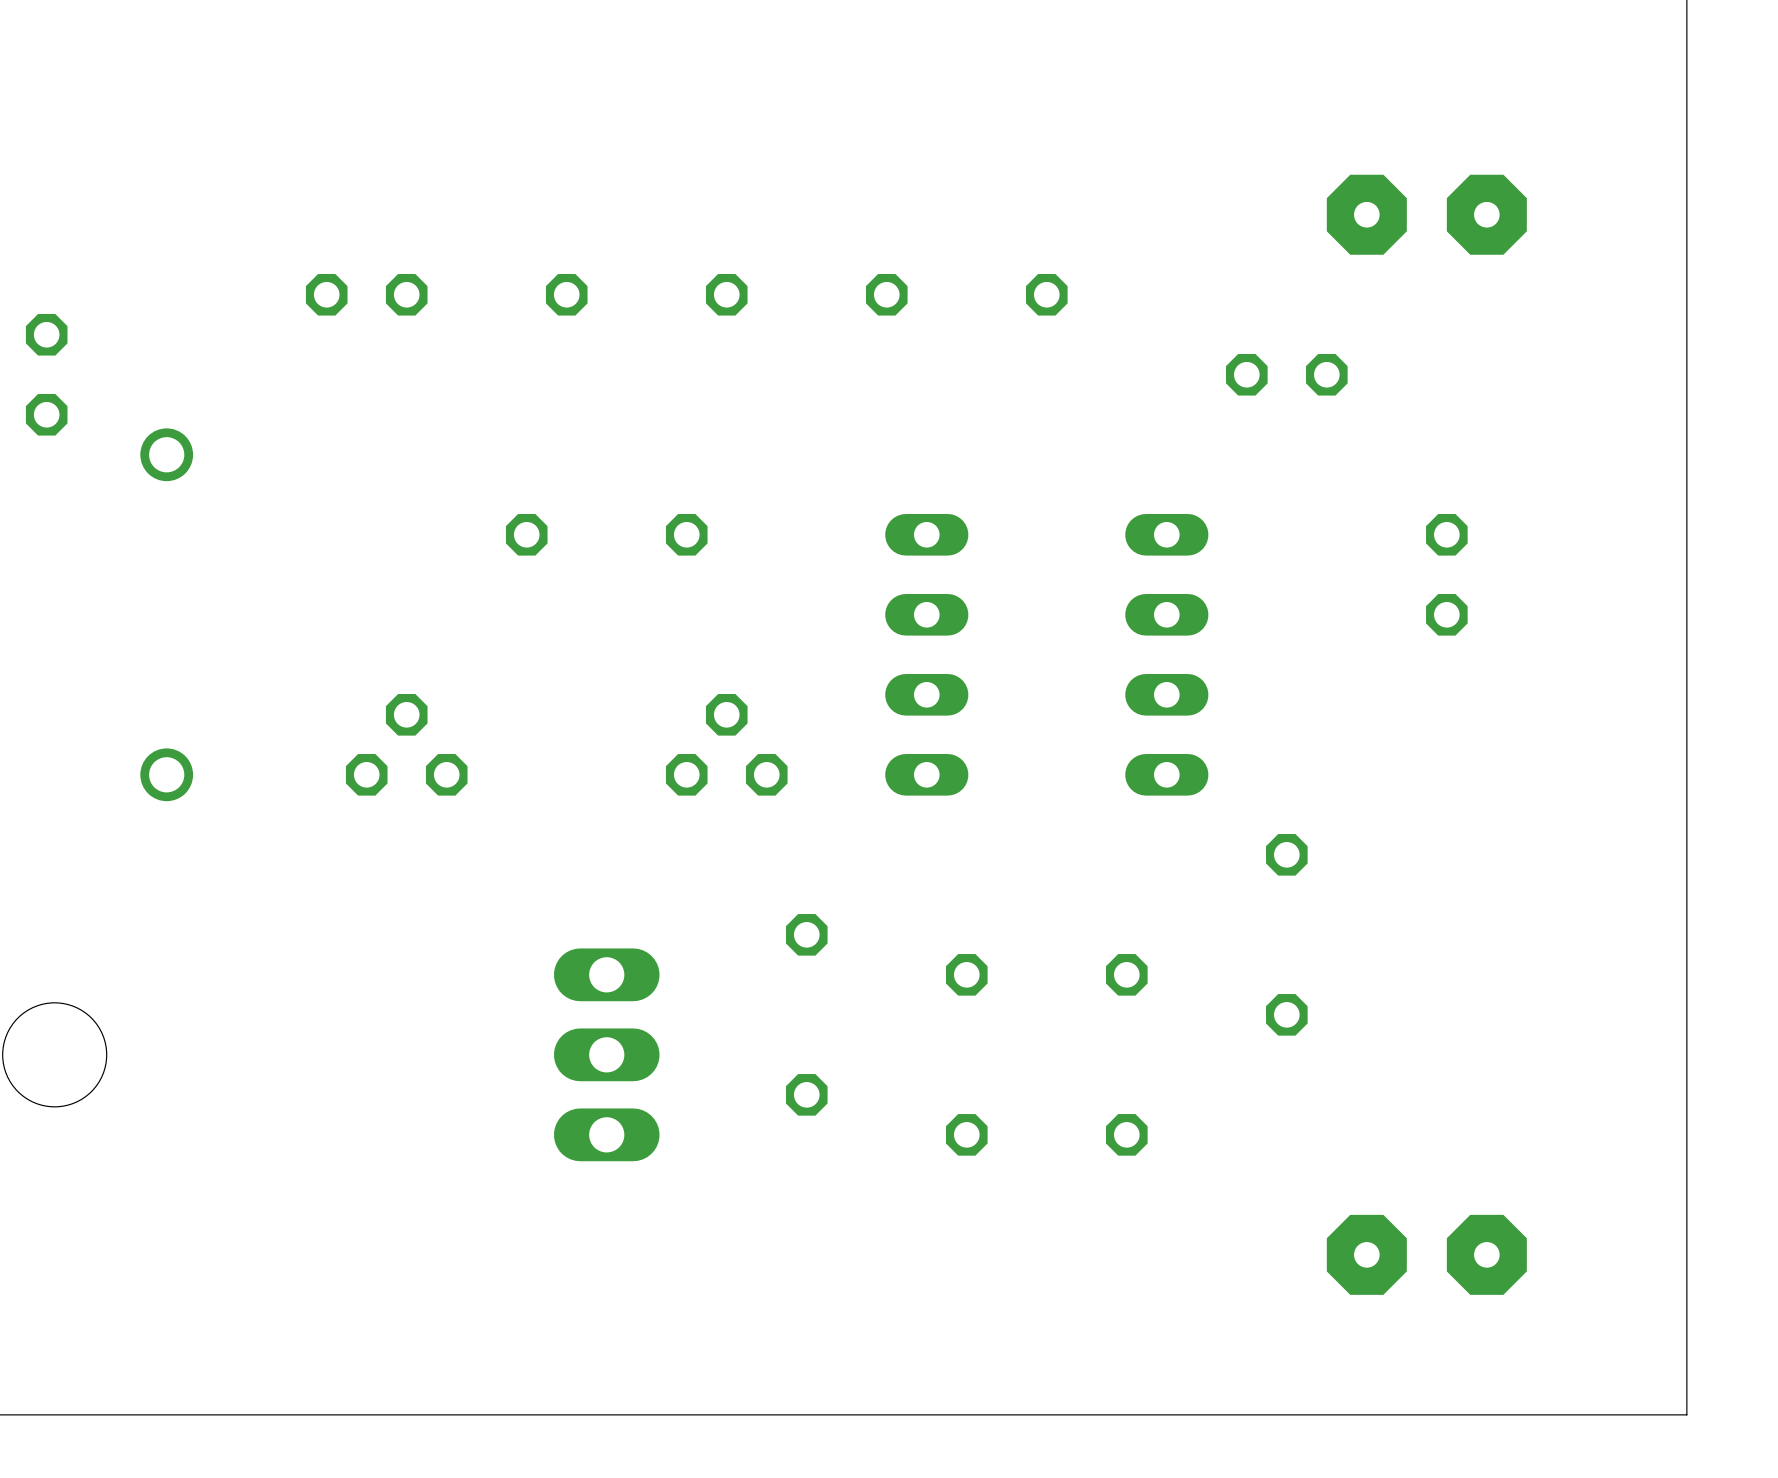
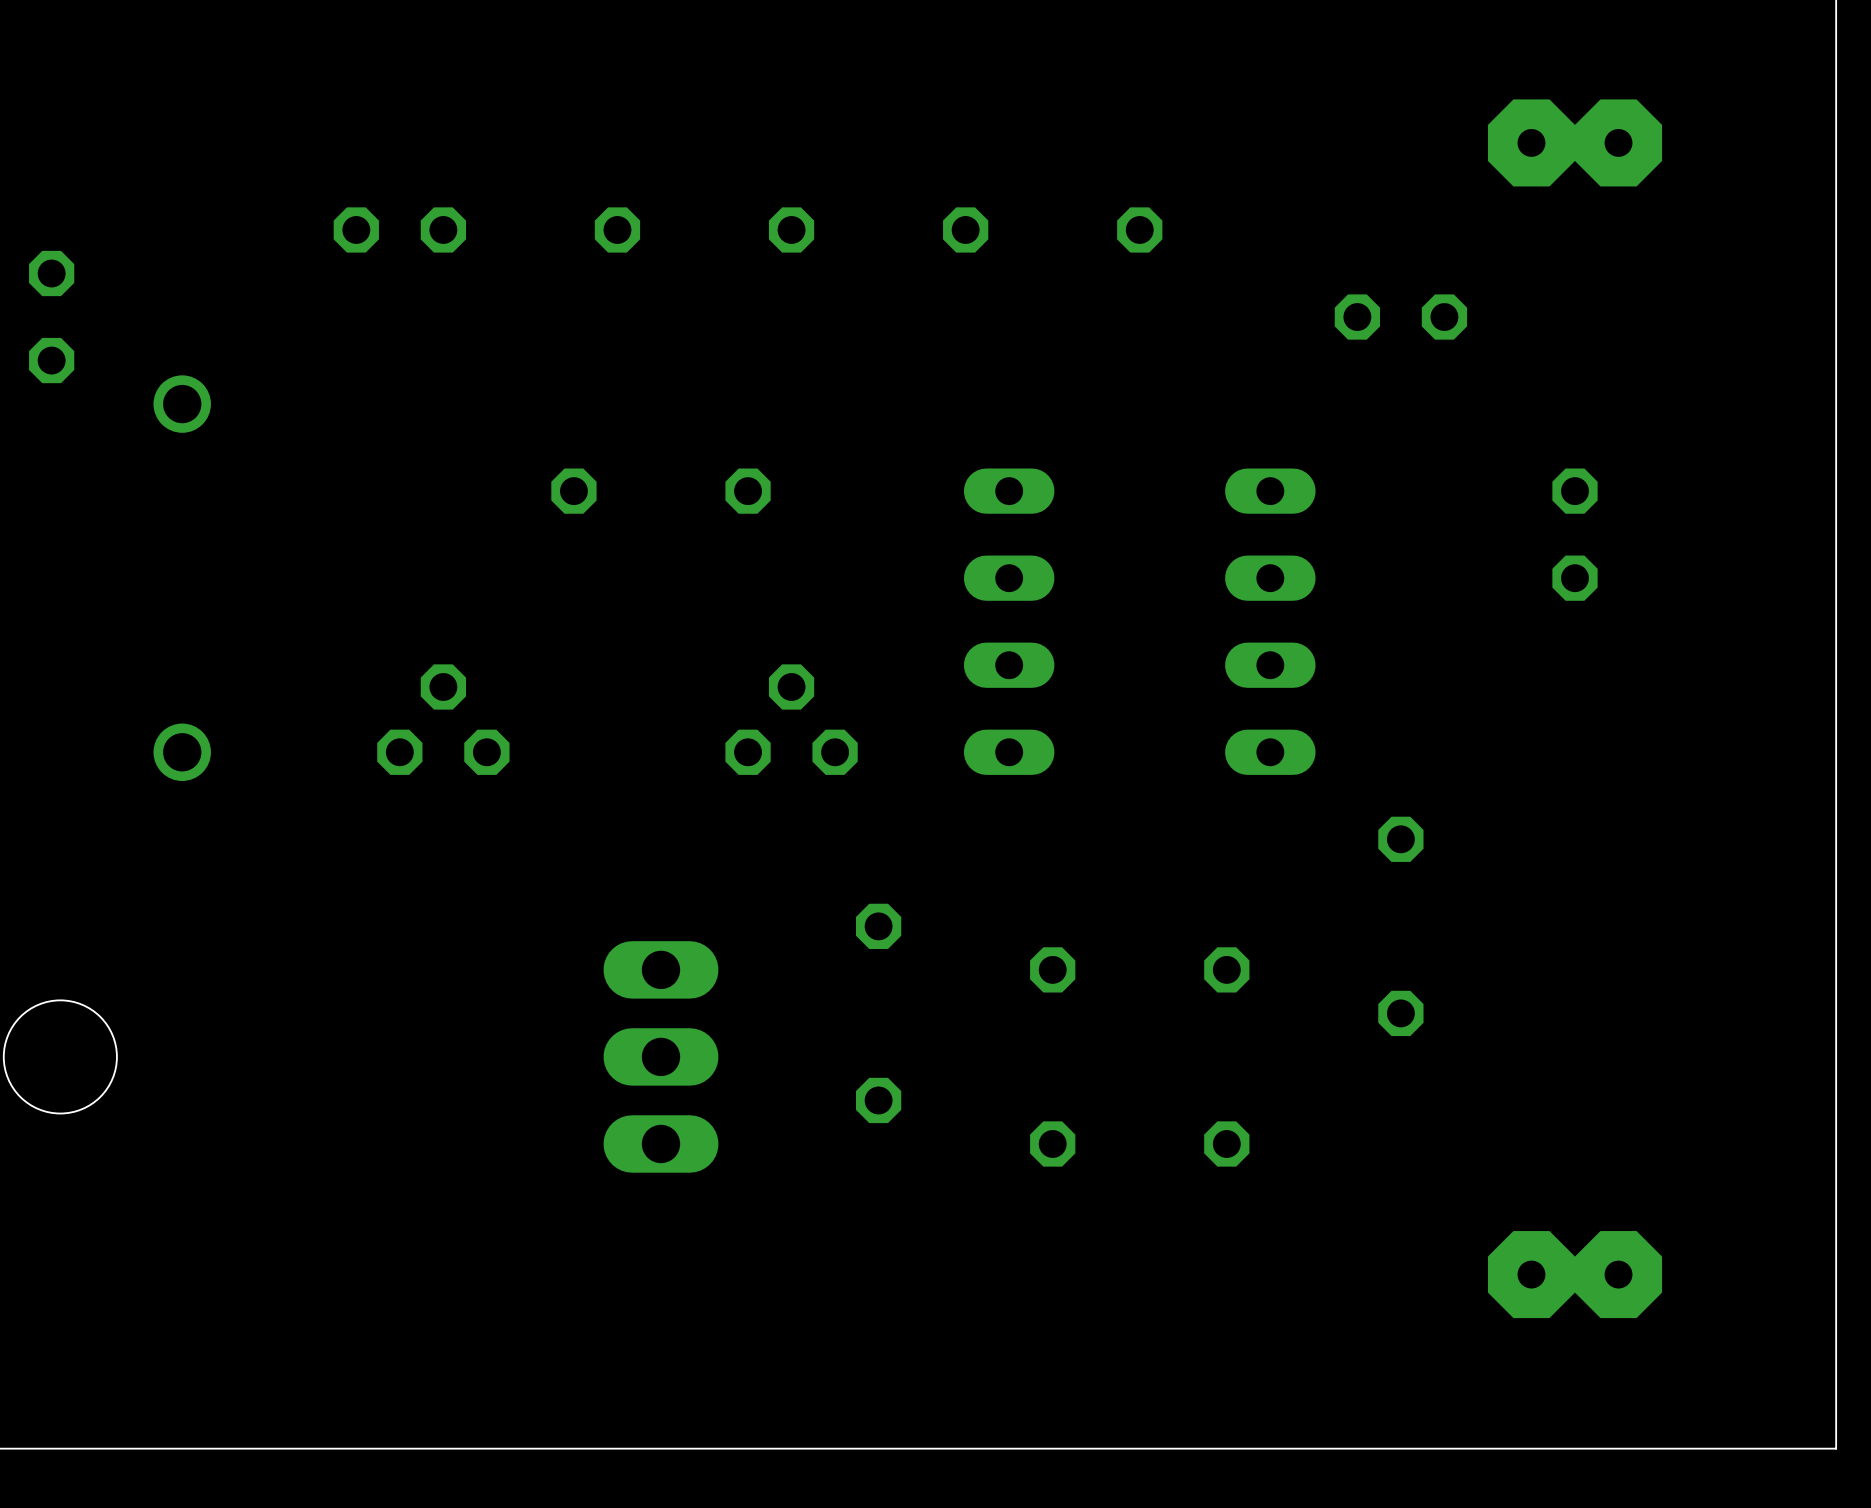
part position: (1366, 214) -> (1531, 142)
part position: (1366, 1254) -> (1531, 1274)

